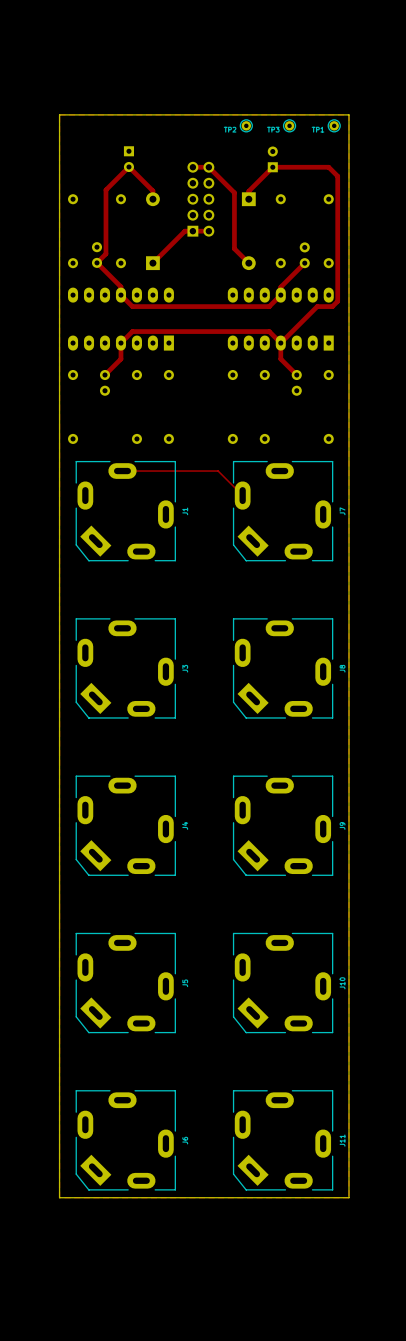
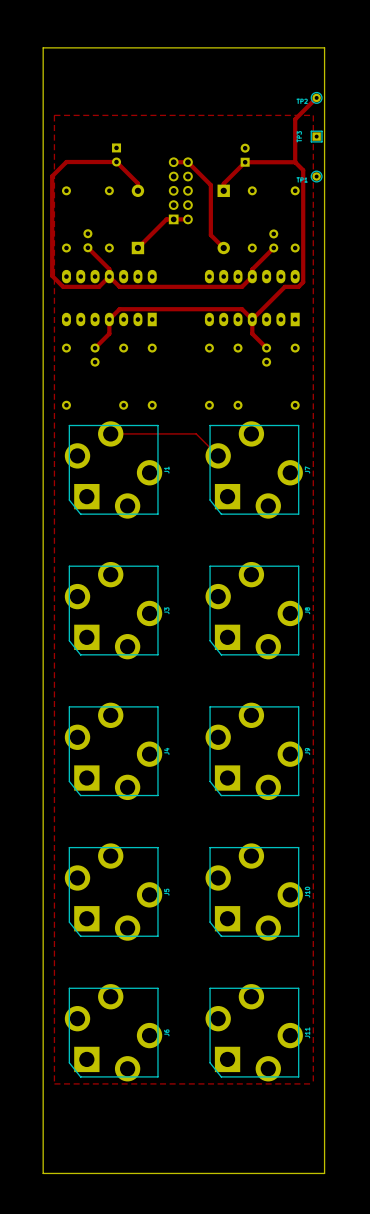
track: none -> (316, 97) (295, 119) (295, 162)
board edge: (59, 114) (349, 114) (349, 1197) (59, 1197) (59, 114) -> (43, 47) (43, 1173) (324, 1173) (324, 47) (43, 47)
part footprint: [283, 119, 296, 133] -> [310, 130, 323, 143]
part position: (246, 125) -> (316, 97)
part position: (334, 125) -> (316, 176)
track: (128, 167) (105, 189) (105, 253) (97, 262) -> (116, 162) (66, 162) (52, 176) (52, 275) (63, 286) (99, 286) (109, 276)
part footprint: [75, 461, 176, 562] -> [64, 421, 163, 519]
part footprint: [233, 461, 334, 562] -> [205, 421, 303, 519]
part footprint: [75, 618, 176, 719] -> [64, 561, 163, 660]
part footprint: [233, 618, 334, 719] -> [205, 561, 303, 660]
part footprint: [75, 775, 176, 876] -> [64, 702, 163, 801]
part footprint: [233, 775, 334, 876] -> [205, 702, 303, 801]
part footprint: [75, 933, 176, 1033] -> [64, 843, 163, 941]
part footprint: [233, 933, 334, 1033] -> [205, 843, 303, 941]
part footprint: [75, 1090, 176, 1191] -> [64, 984, 163, 1082]
part footprint: [233, 1090, 334, 1191] -> [205, 984, 303, 1082]

